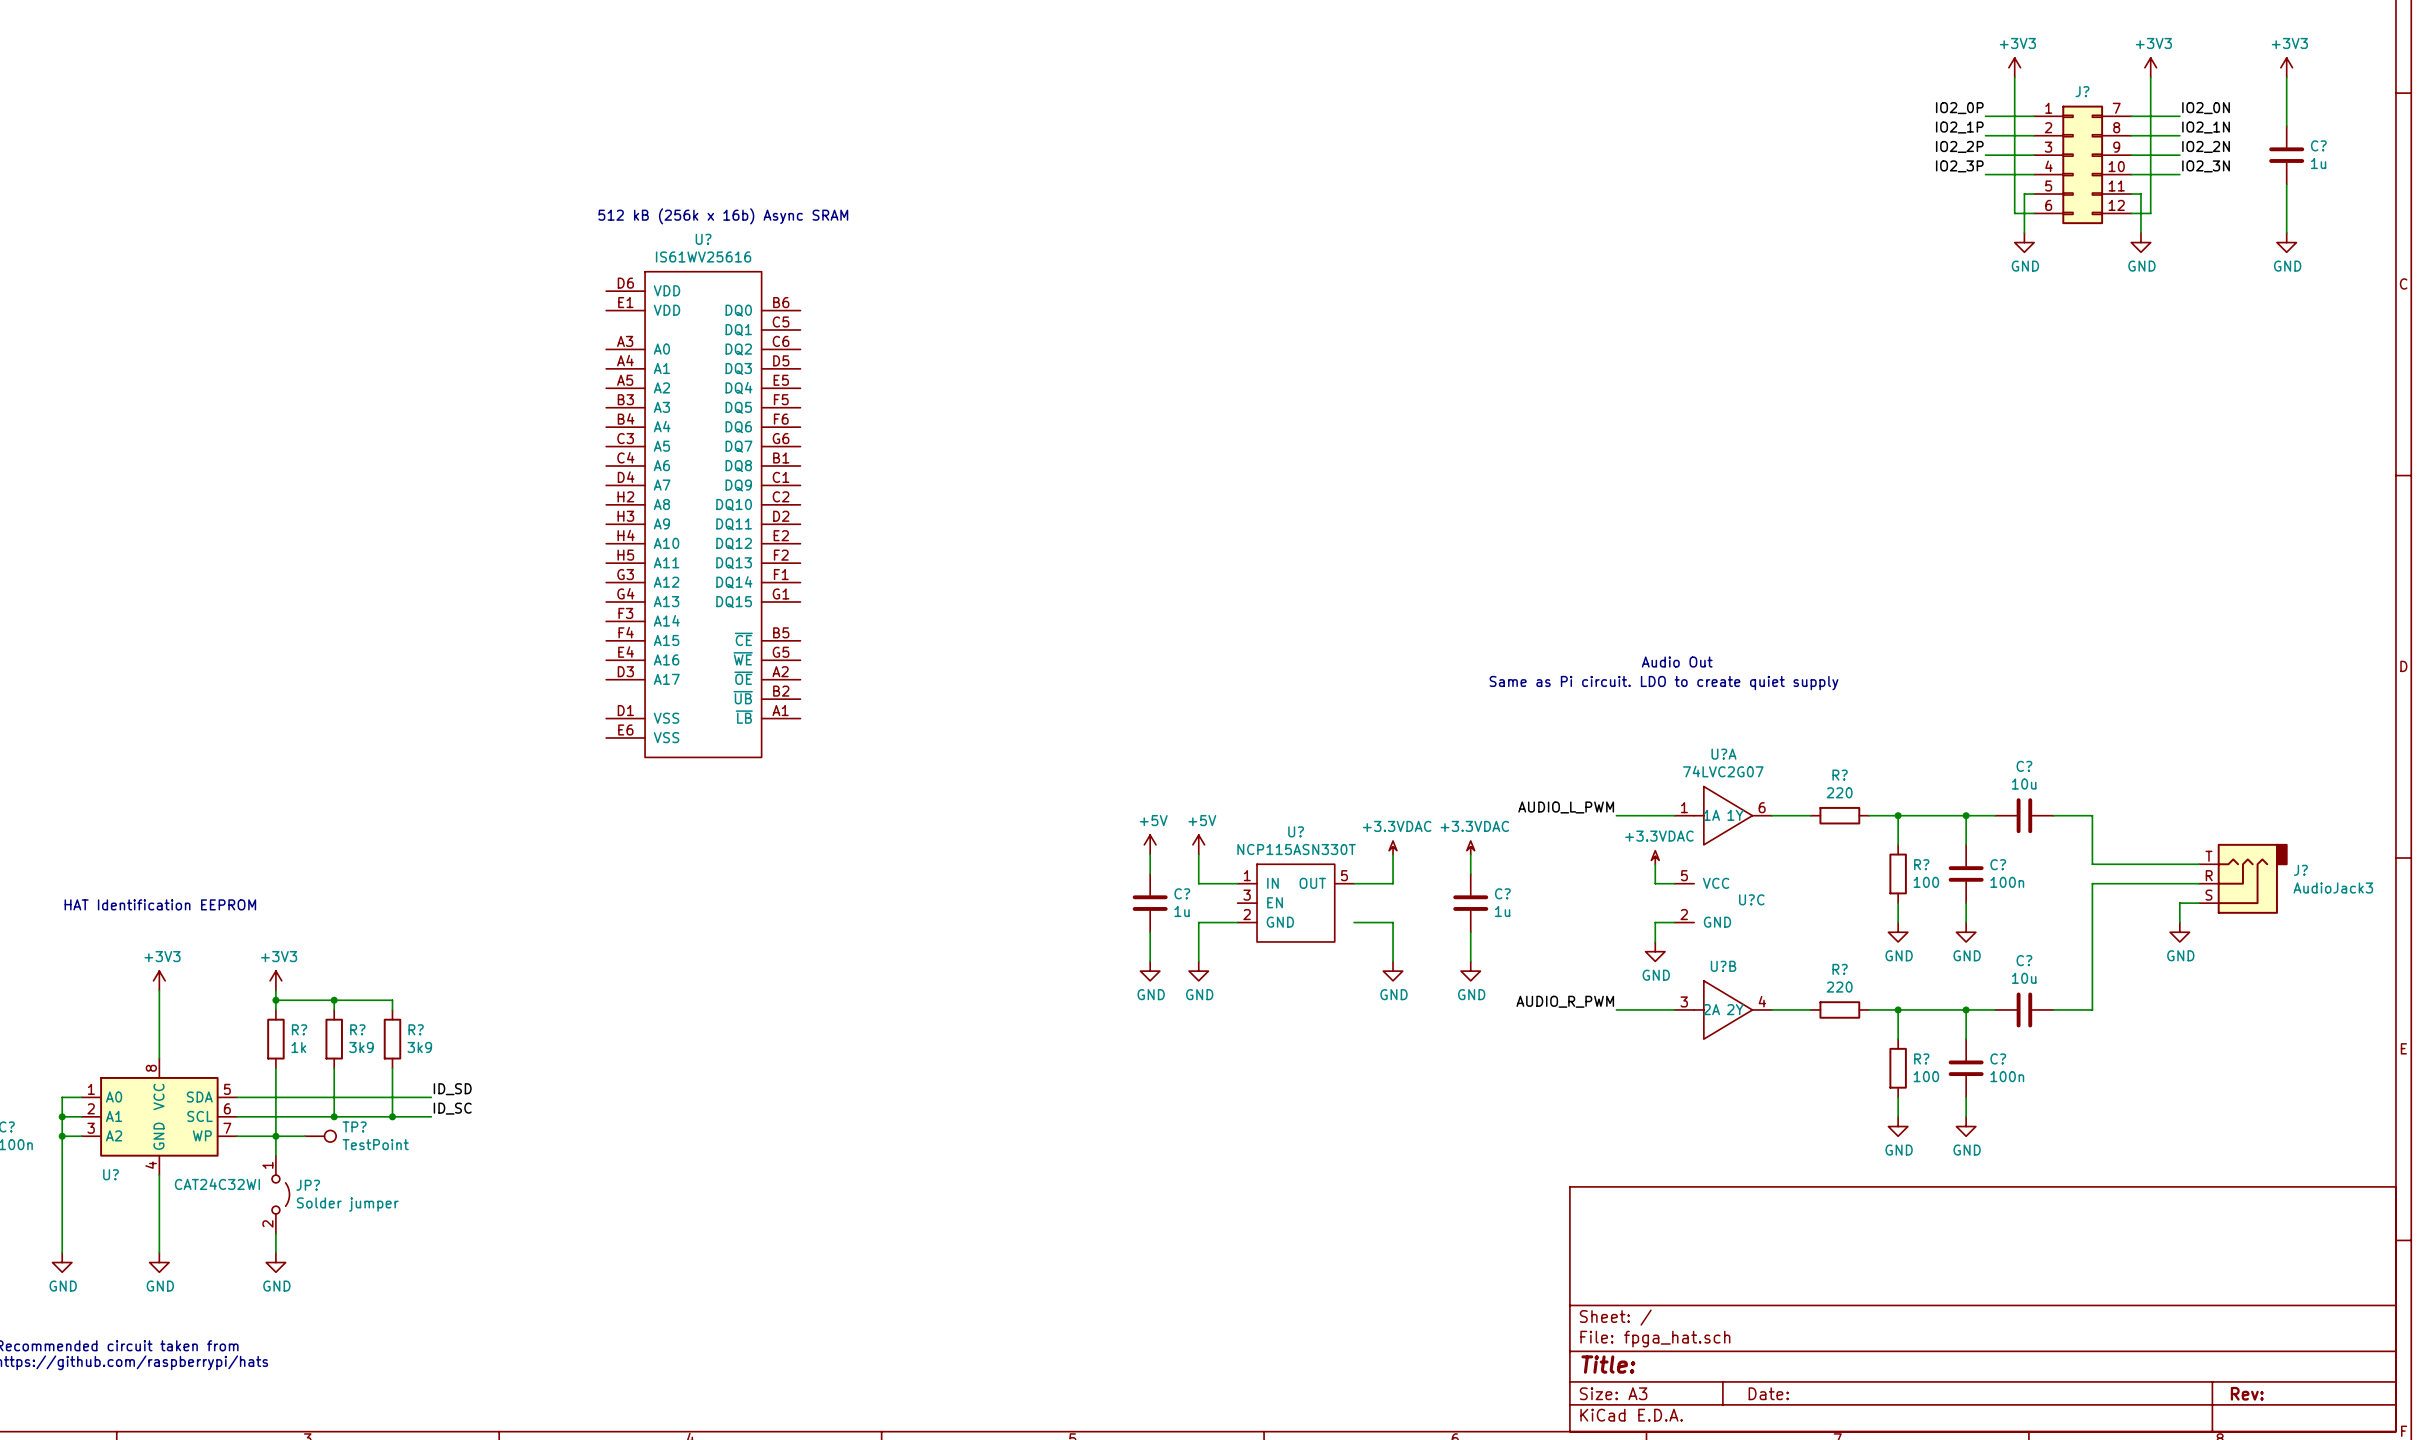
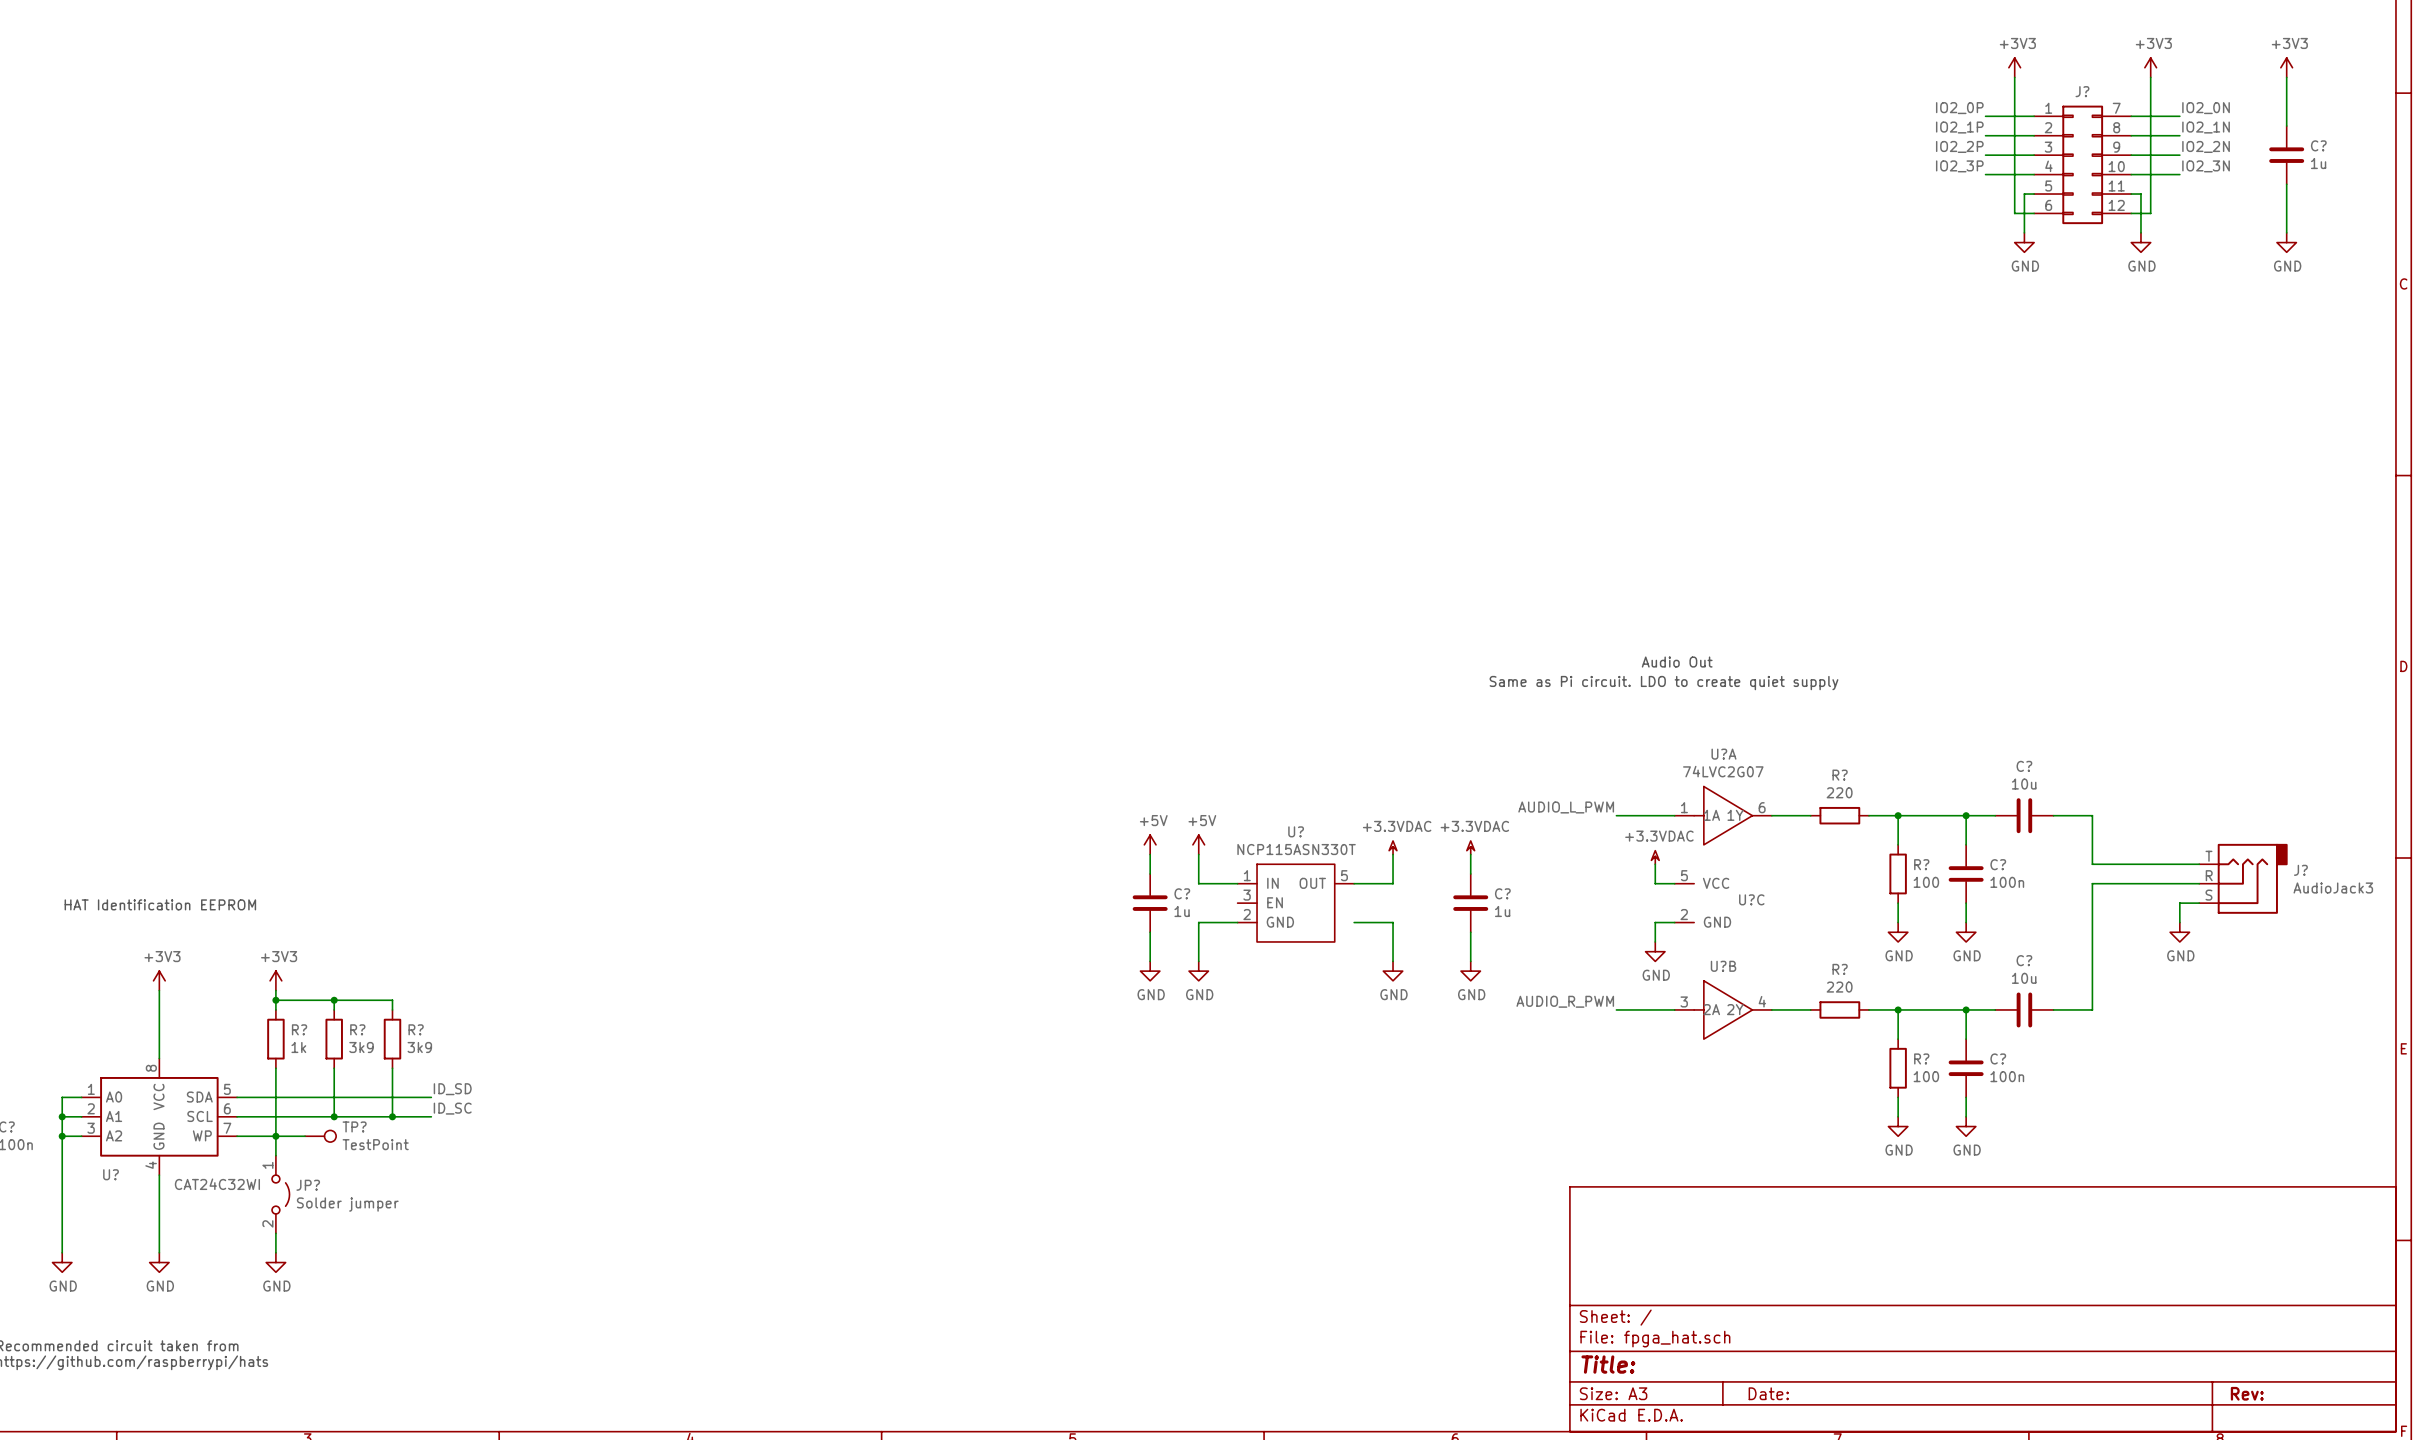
text: 512 kB (256k x 16b) Async SRAM (723, 216) -> none
U?: IS61WV25616 (703, 514) -> none

